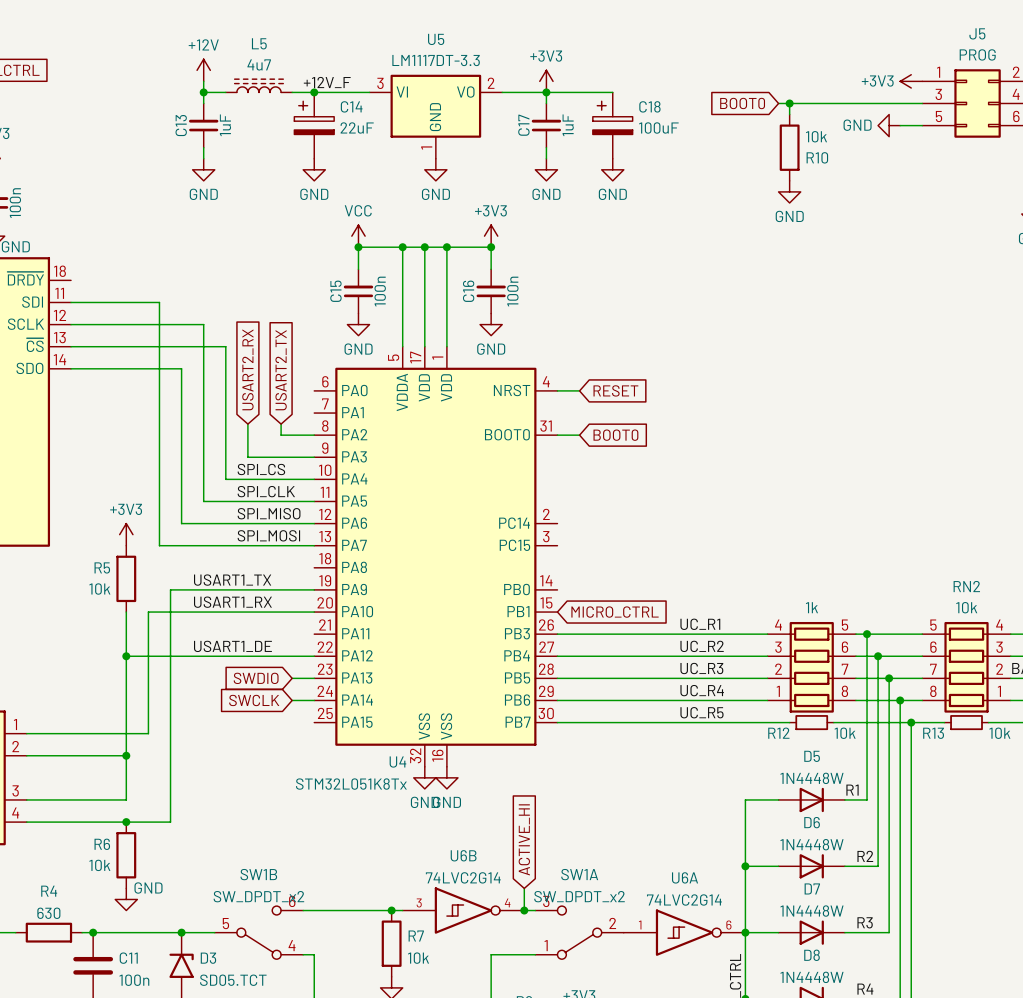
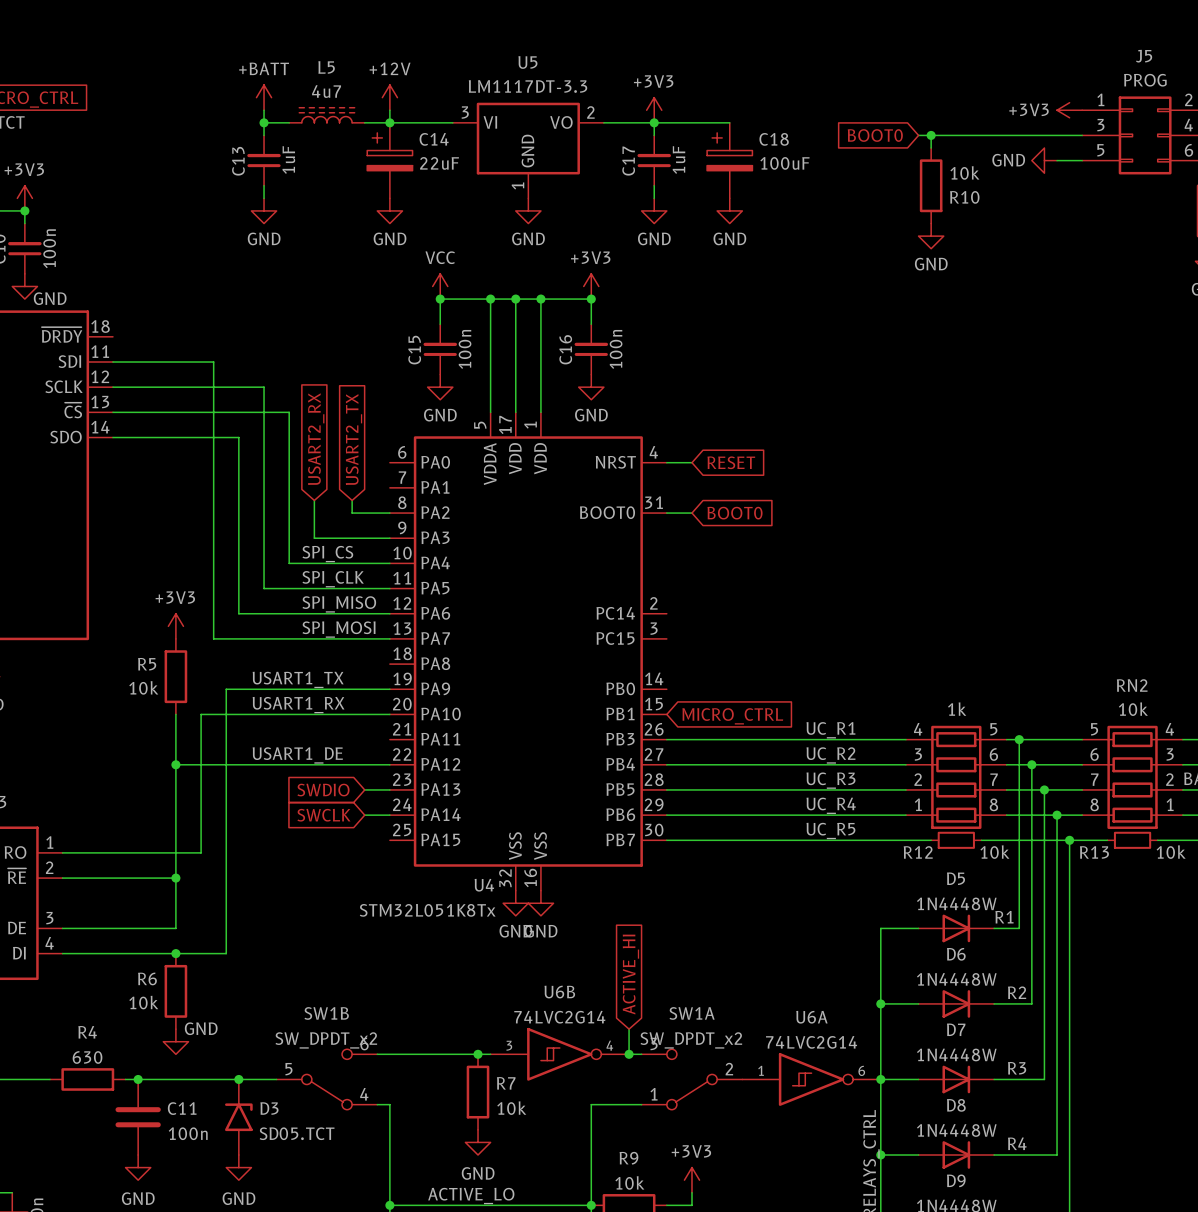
power symbol: +12V (203, 70) -> +BATT (264, 97)
power symbol: none -> +12V (389, 97)
wire: none -> (389, 110) (389, 122)
label: +12V_F (327, 82) -> none

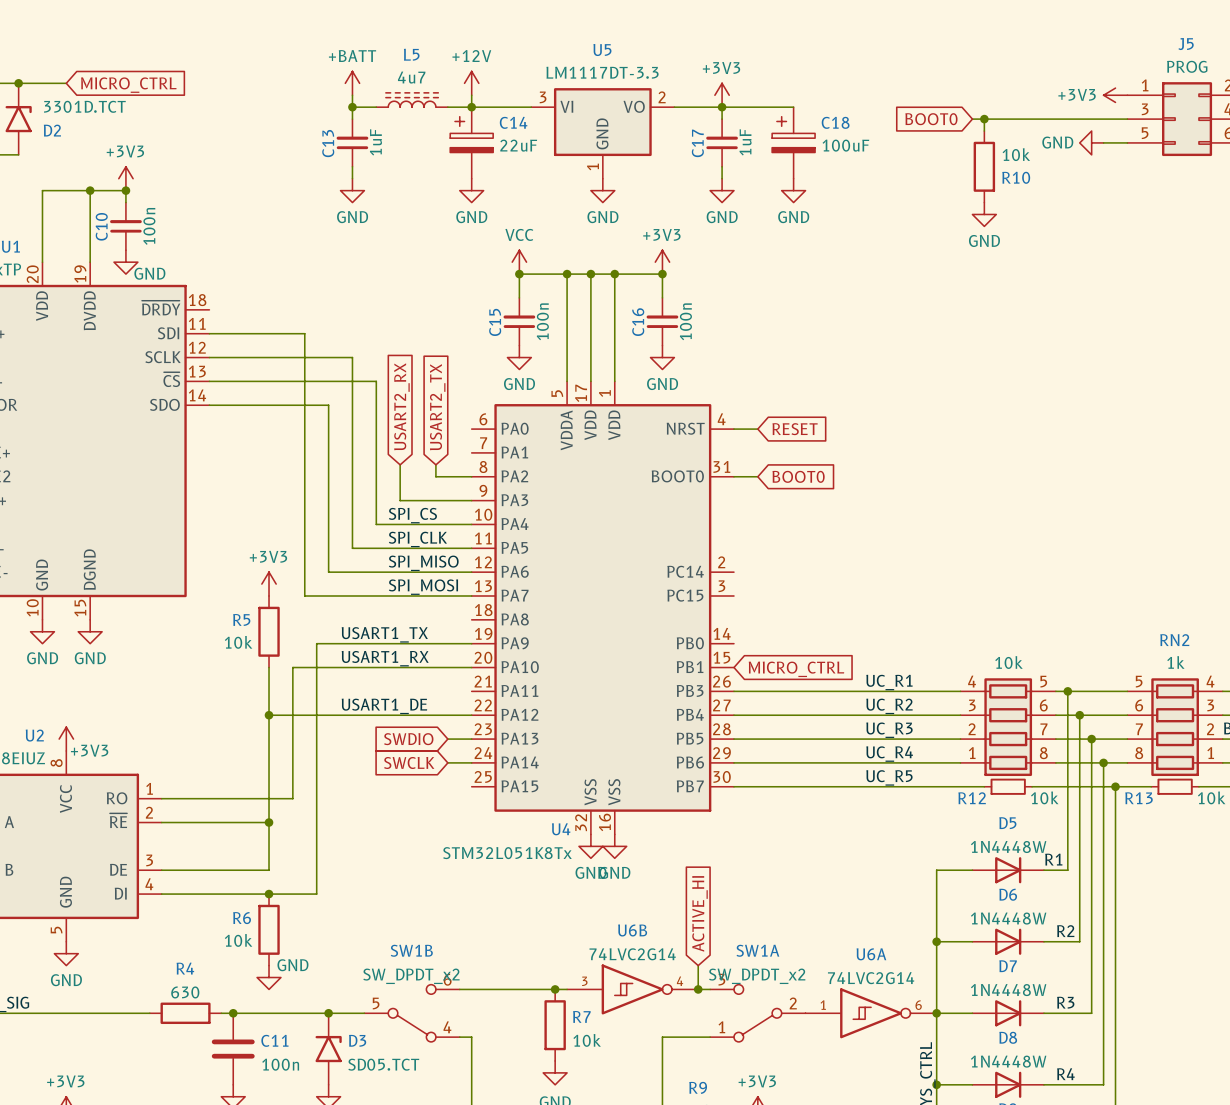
part value: 1k (957, 709) -> 10k (1008, 662)
RN2 value: 10k (1133, 709) -> 1k (1175, 662)

